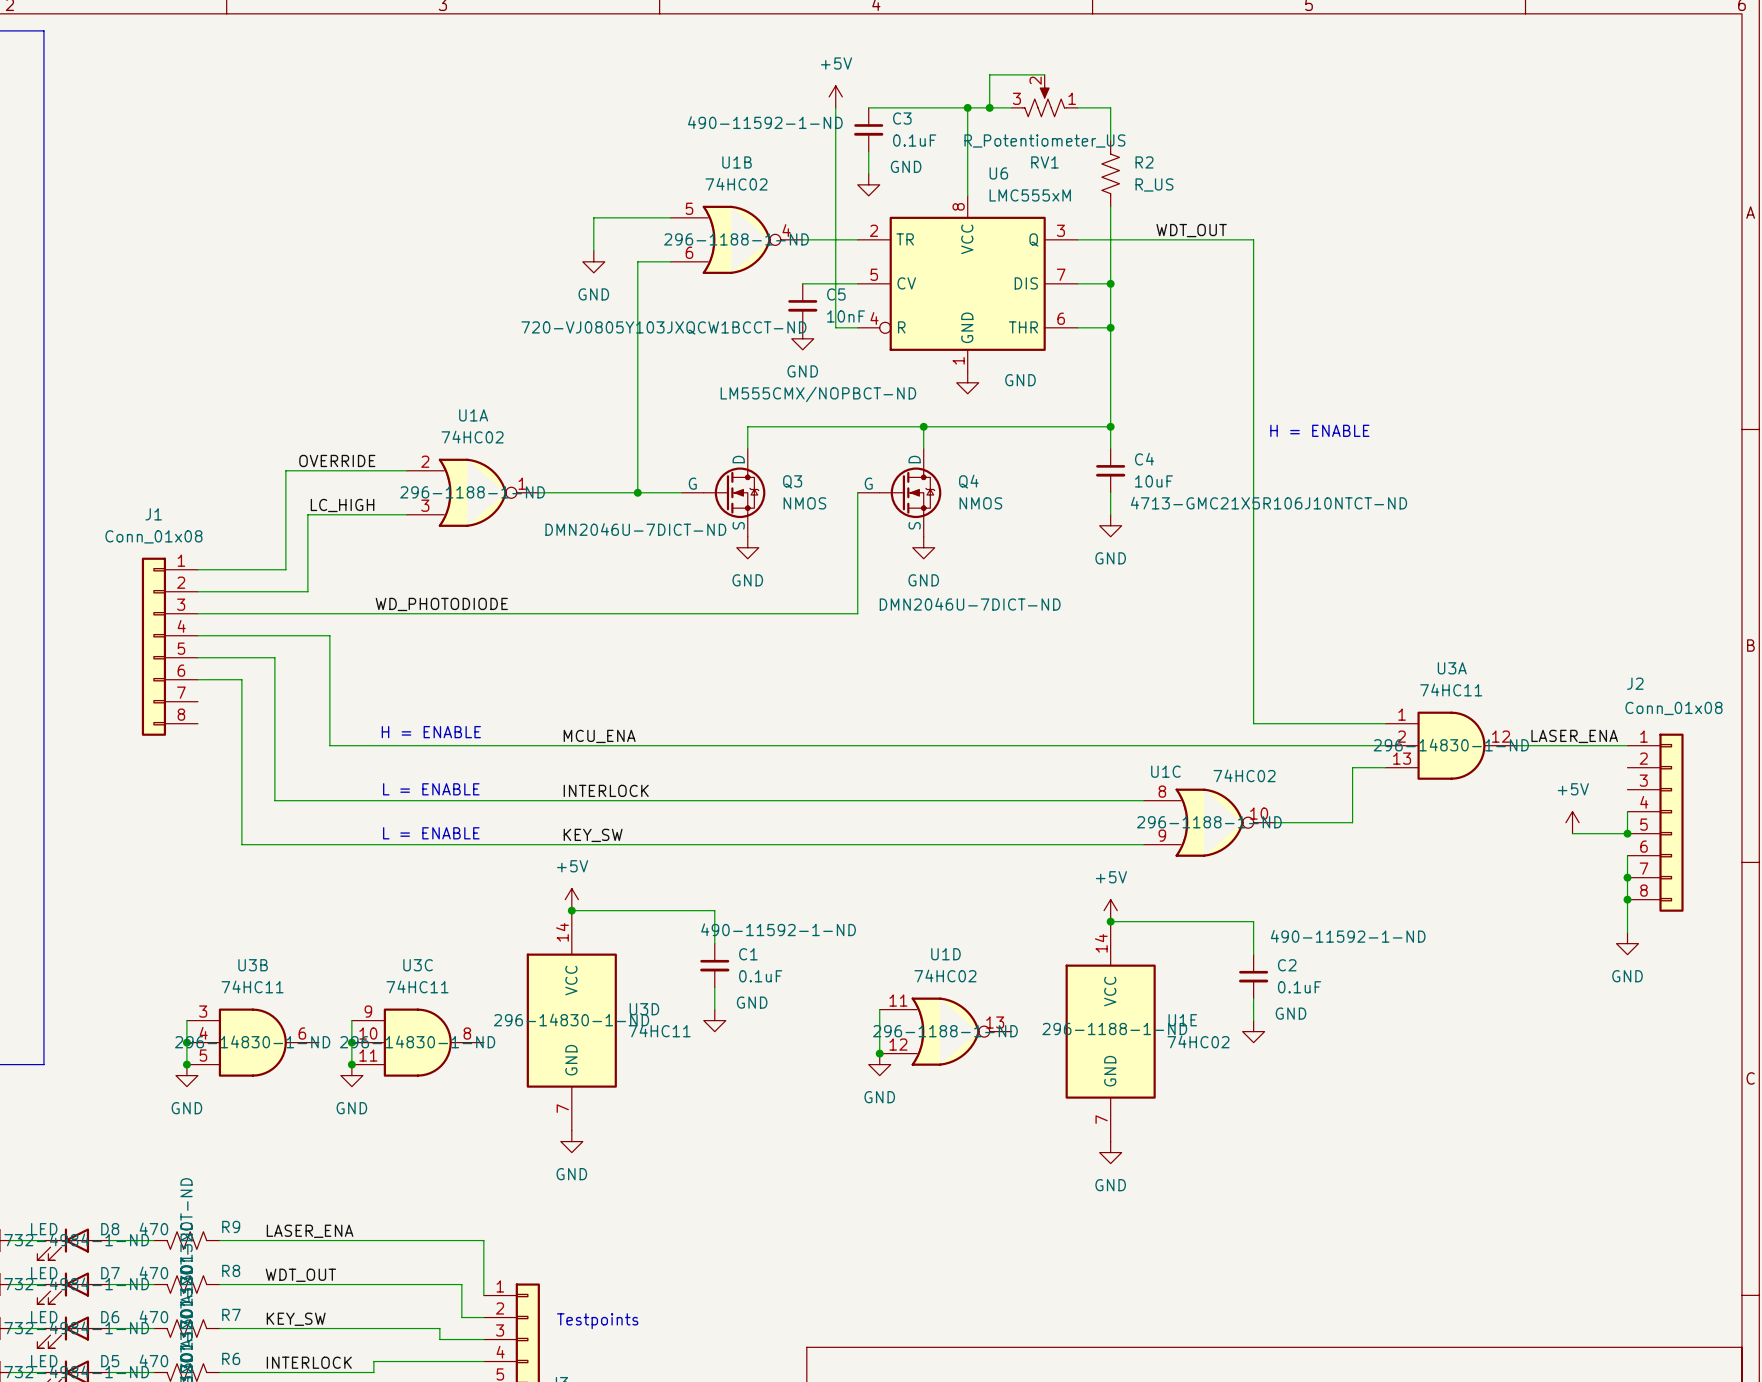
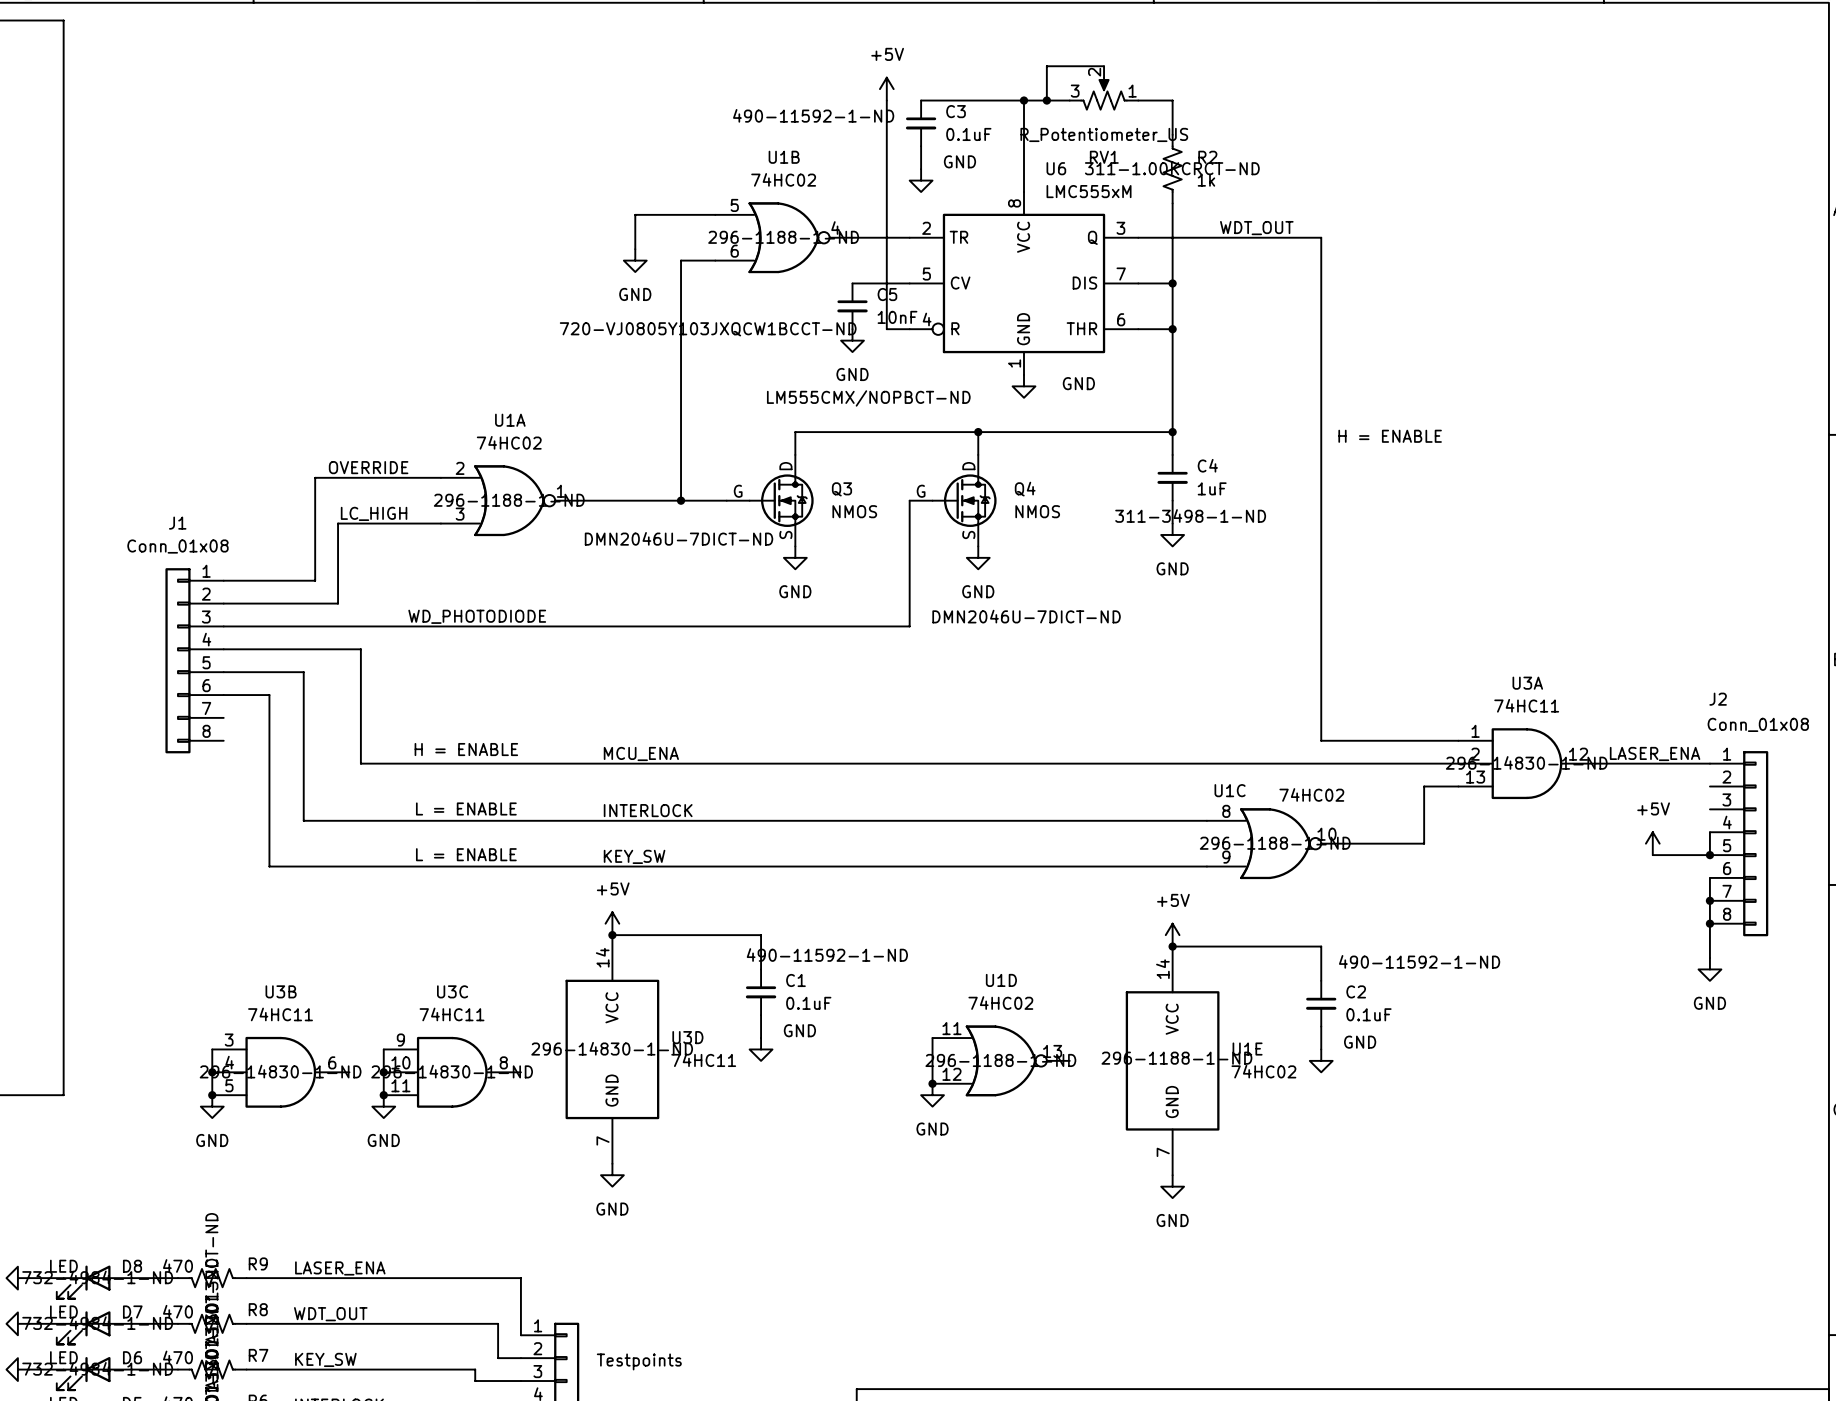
R2 text: none -> 311-1.00KCRCT-ND (1172, 168)
R2 value: R_US (1154, 184) -> 1k (1206, 180)
C4 value: 10uF (1153, 481) -> 1uF (1212, 488)
C4 text: 4713-GMC21X5R106J10NTCT-ND (1269, 503) -> 311-3498-1-ND (1190, 515)

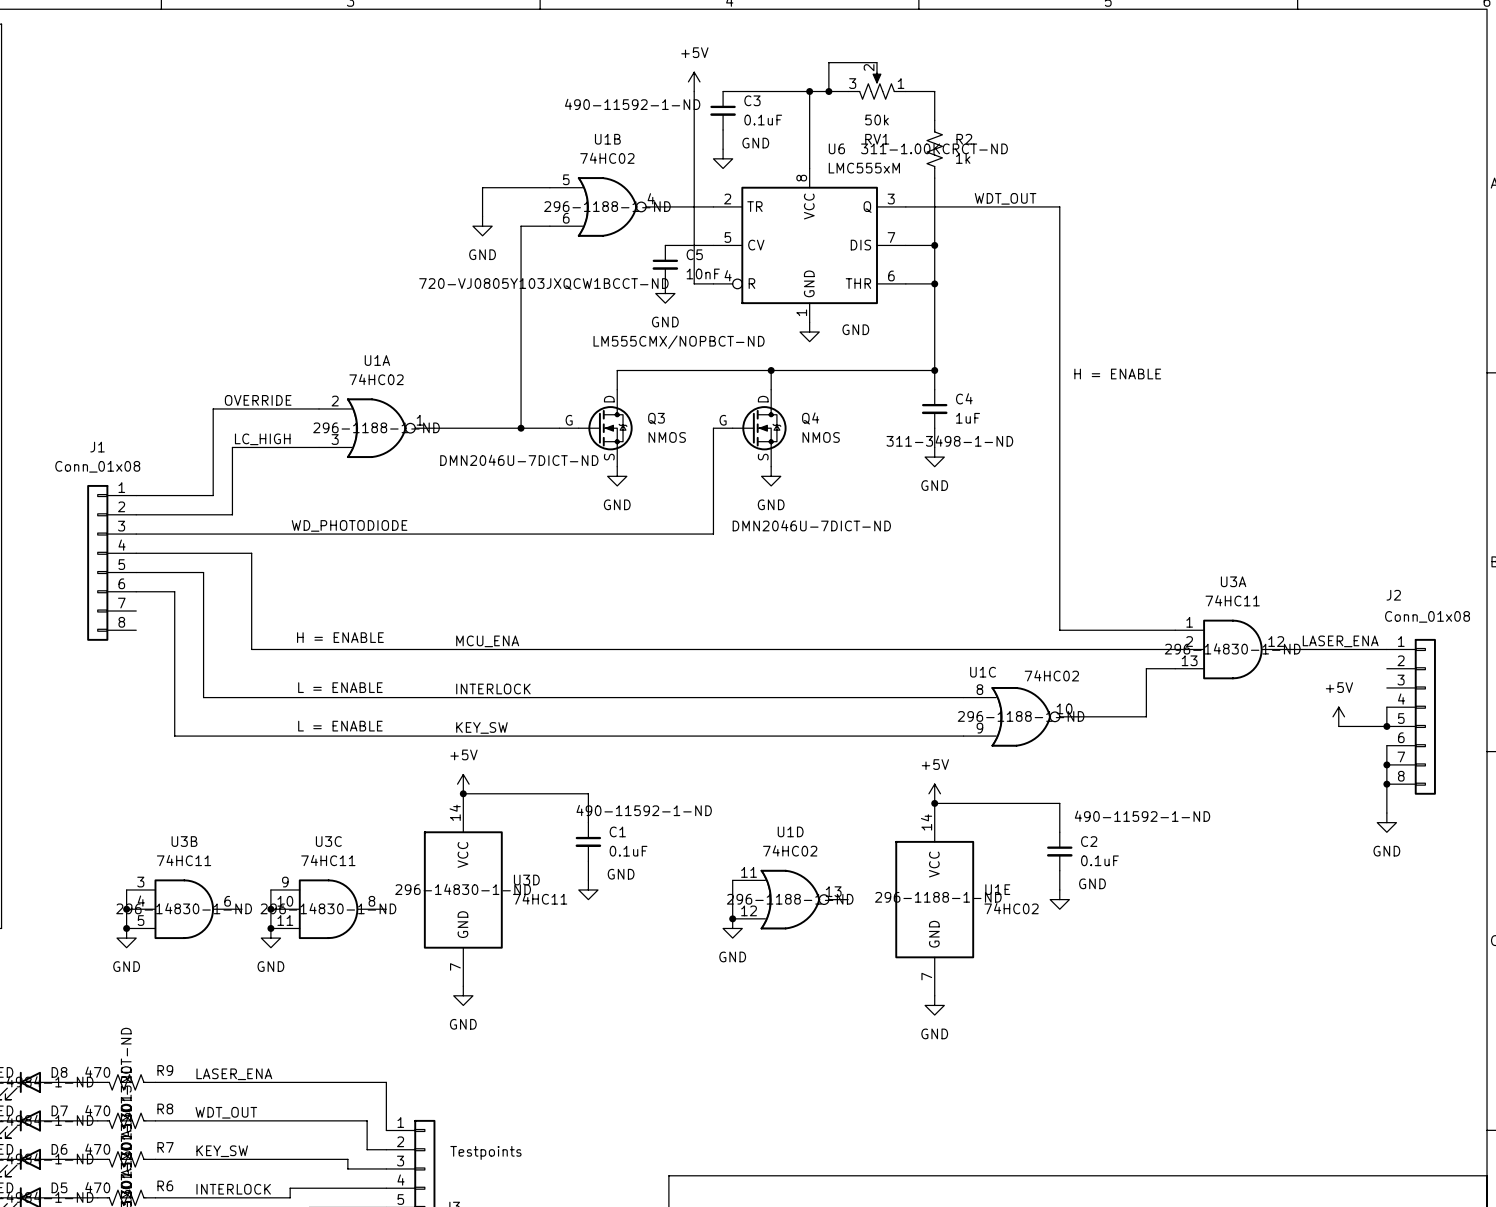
RV1 value: R_Potentiometer_US (1104, 134) -> 50k (876, 120)

